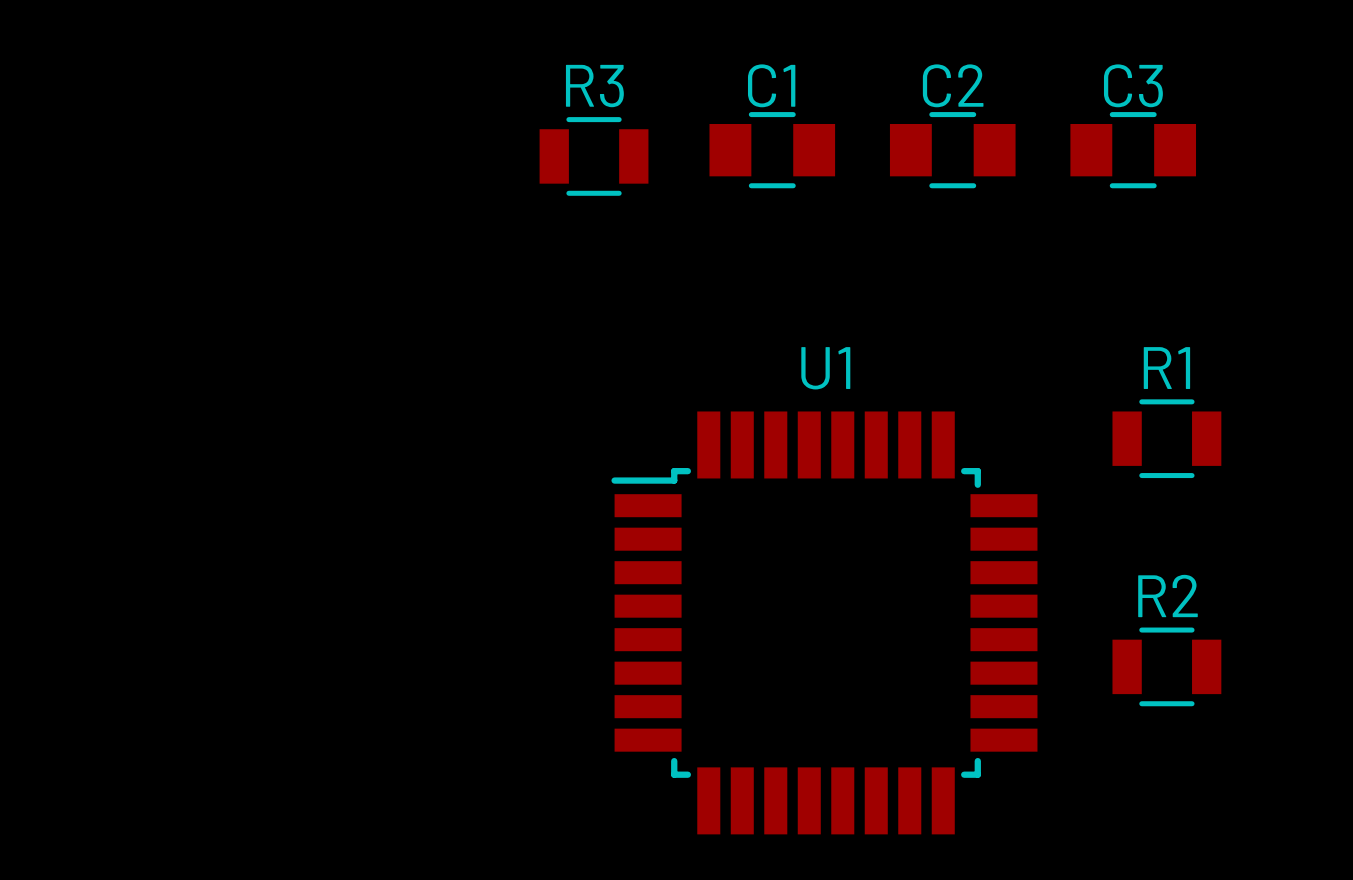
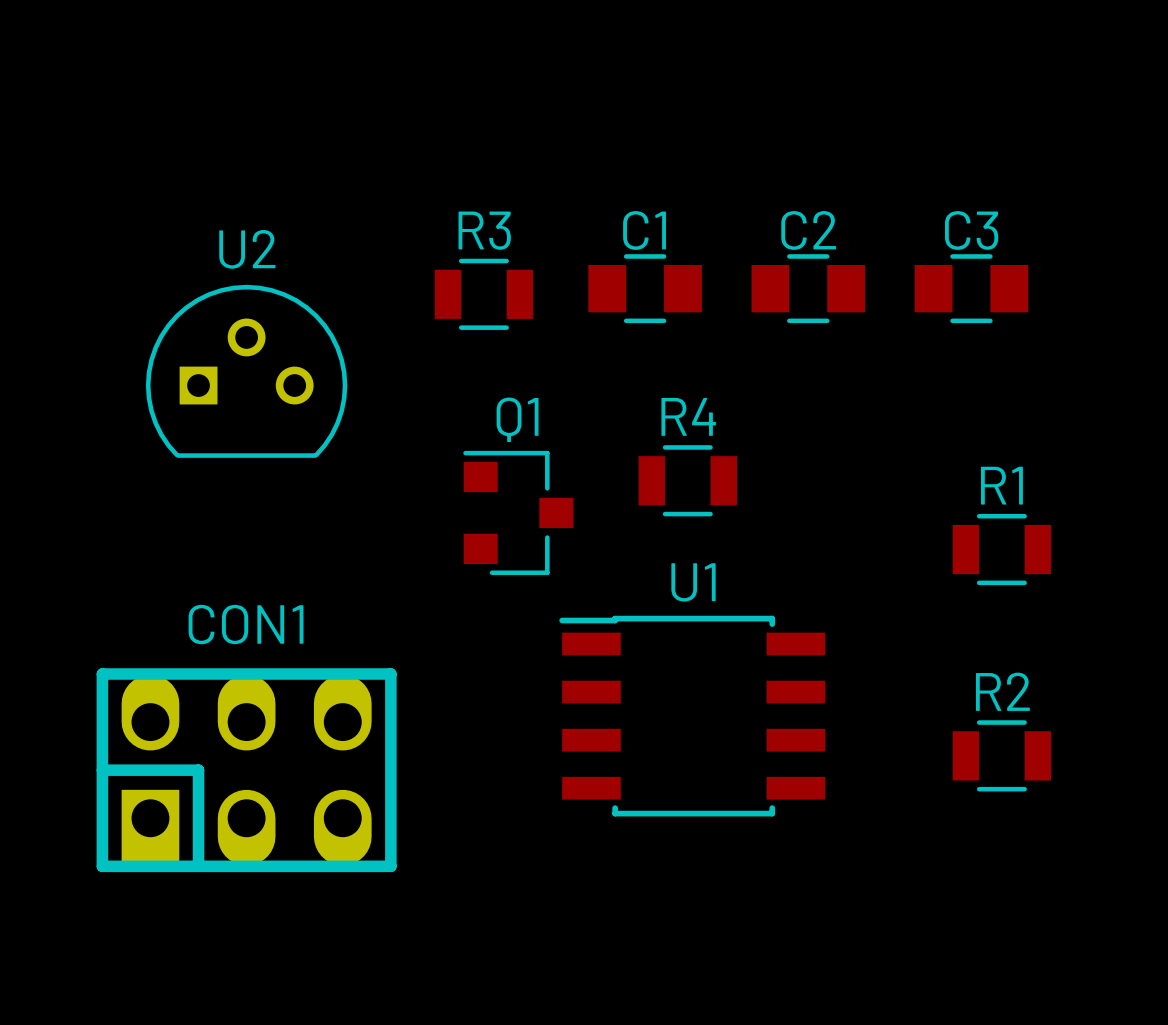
U2: none -> (246, 371)
R4: none -> (687, 480)
U1 name position: U1 (825, 368) -> U1 (693, 582)
Q1: none -> (518, 512)
U1 footprint: [611, 411, 1038, 835] -> [559, 615, 826, 817]
CON1: none -> (246, 770)

